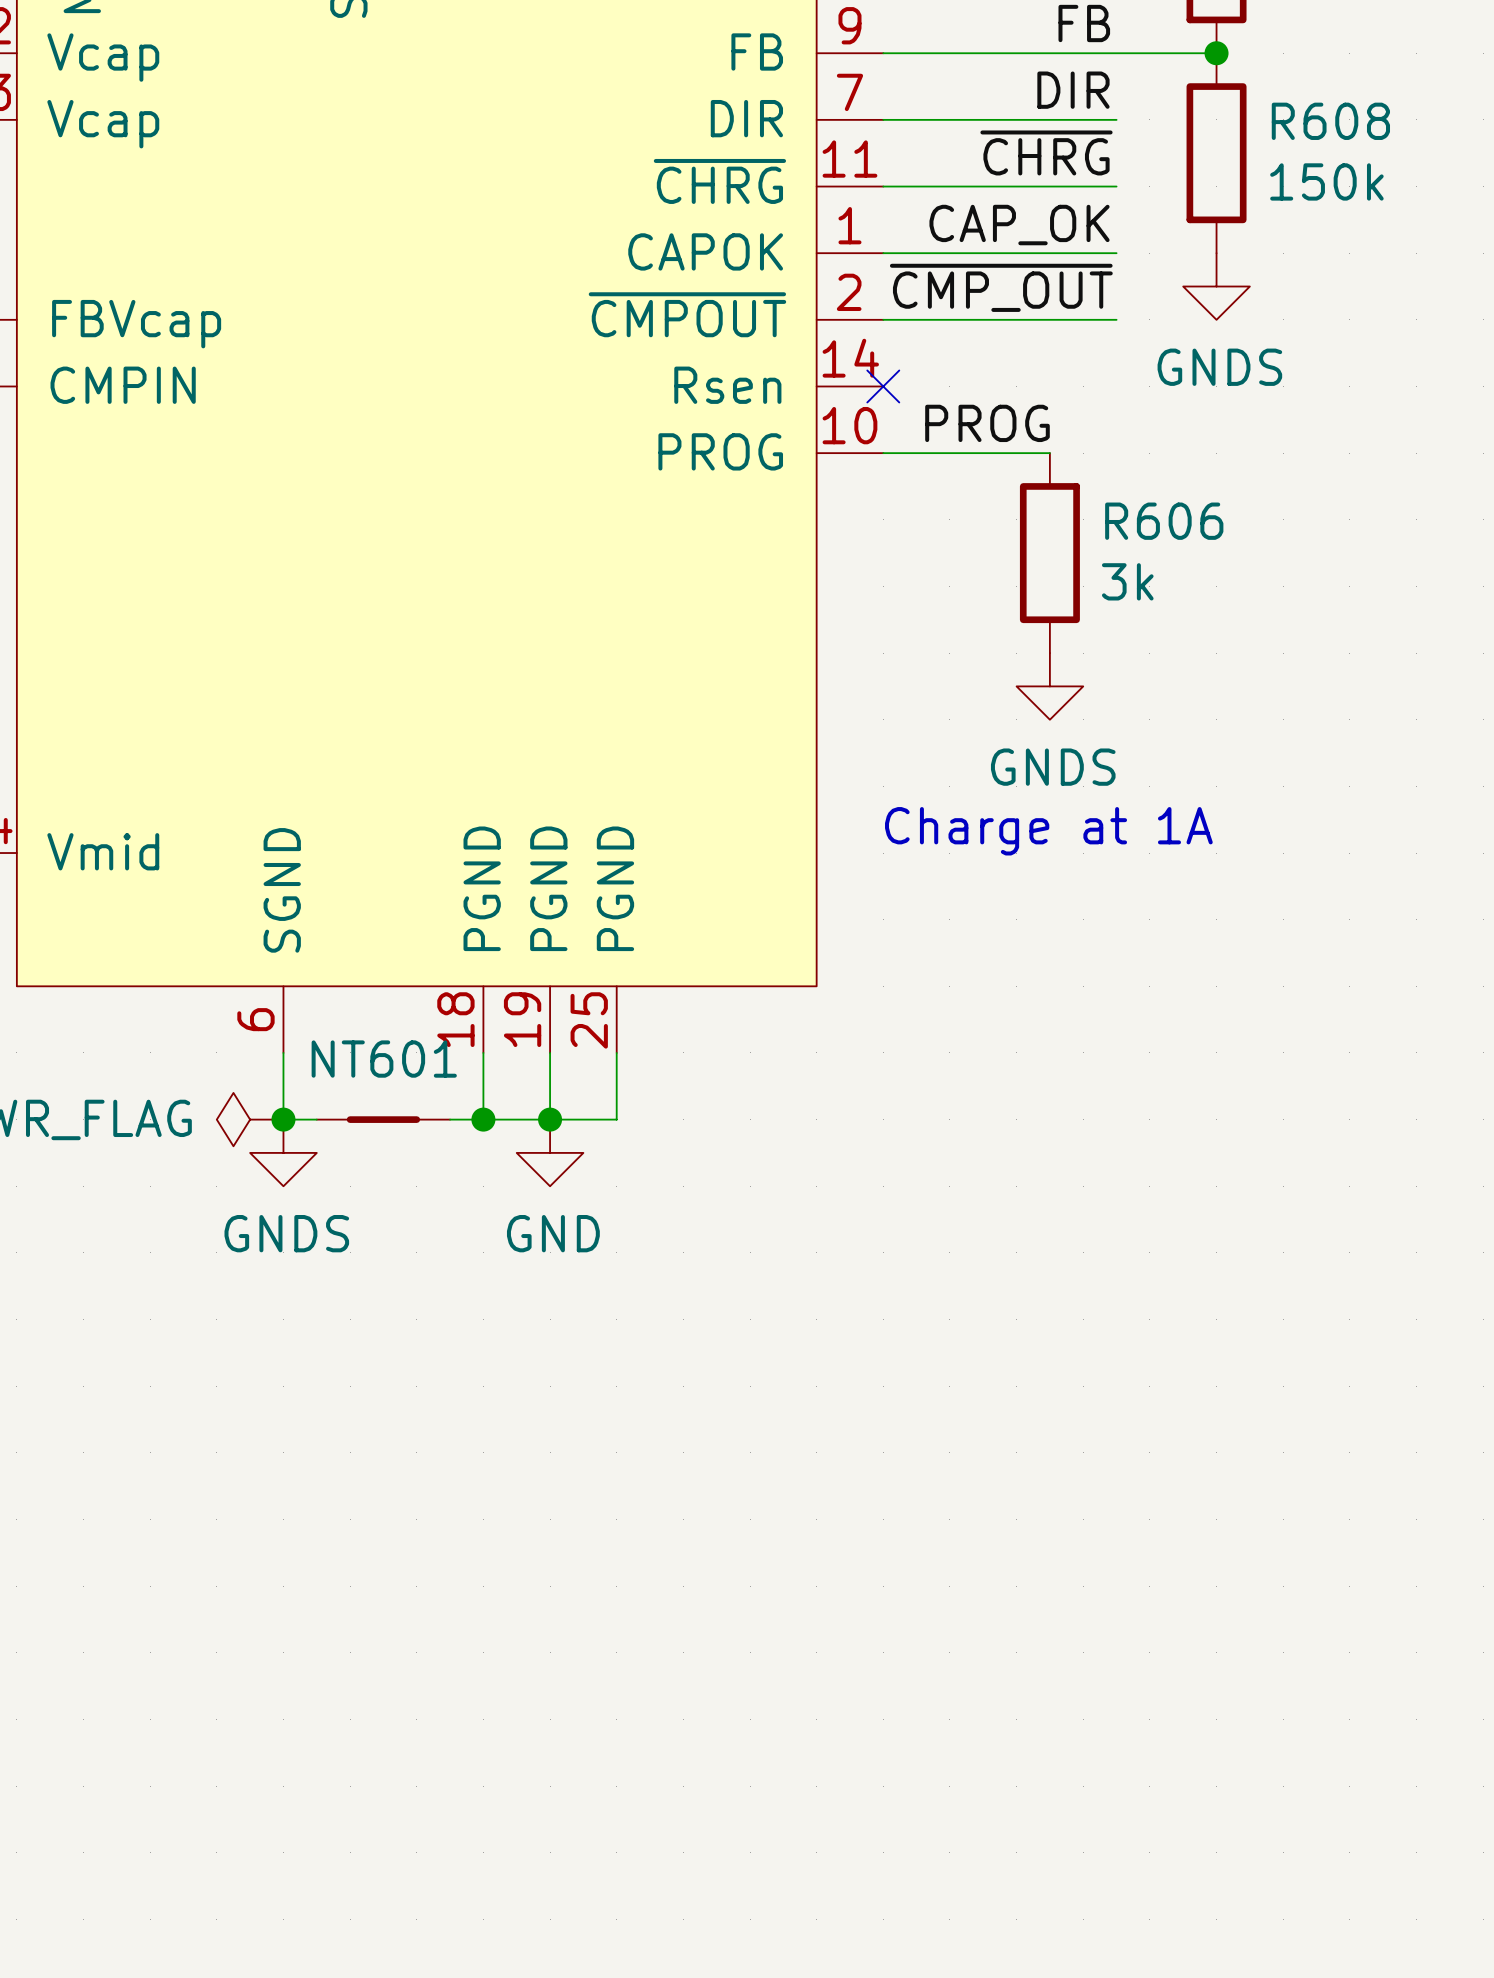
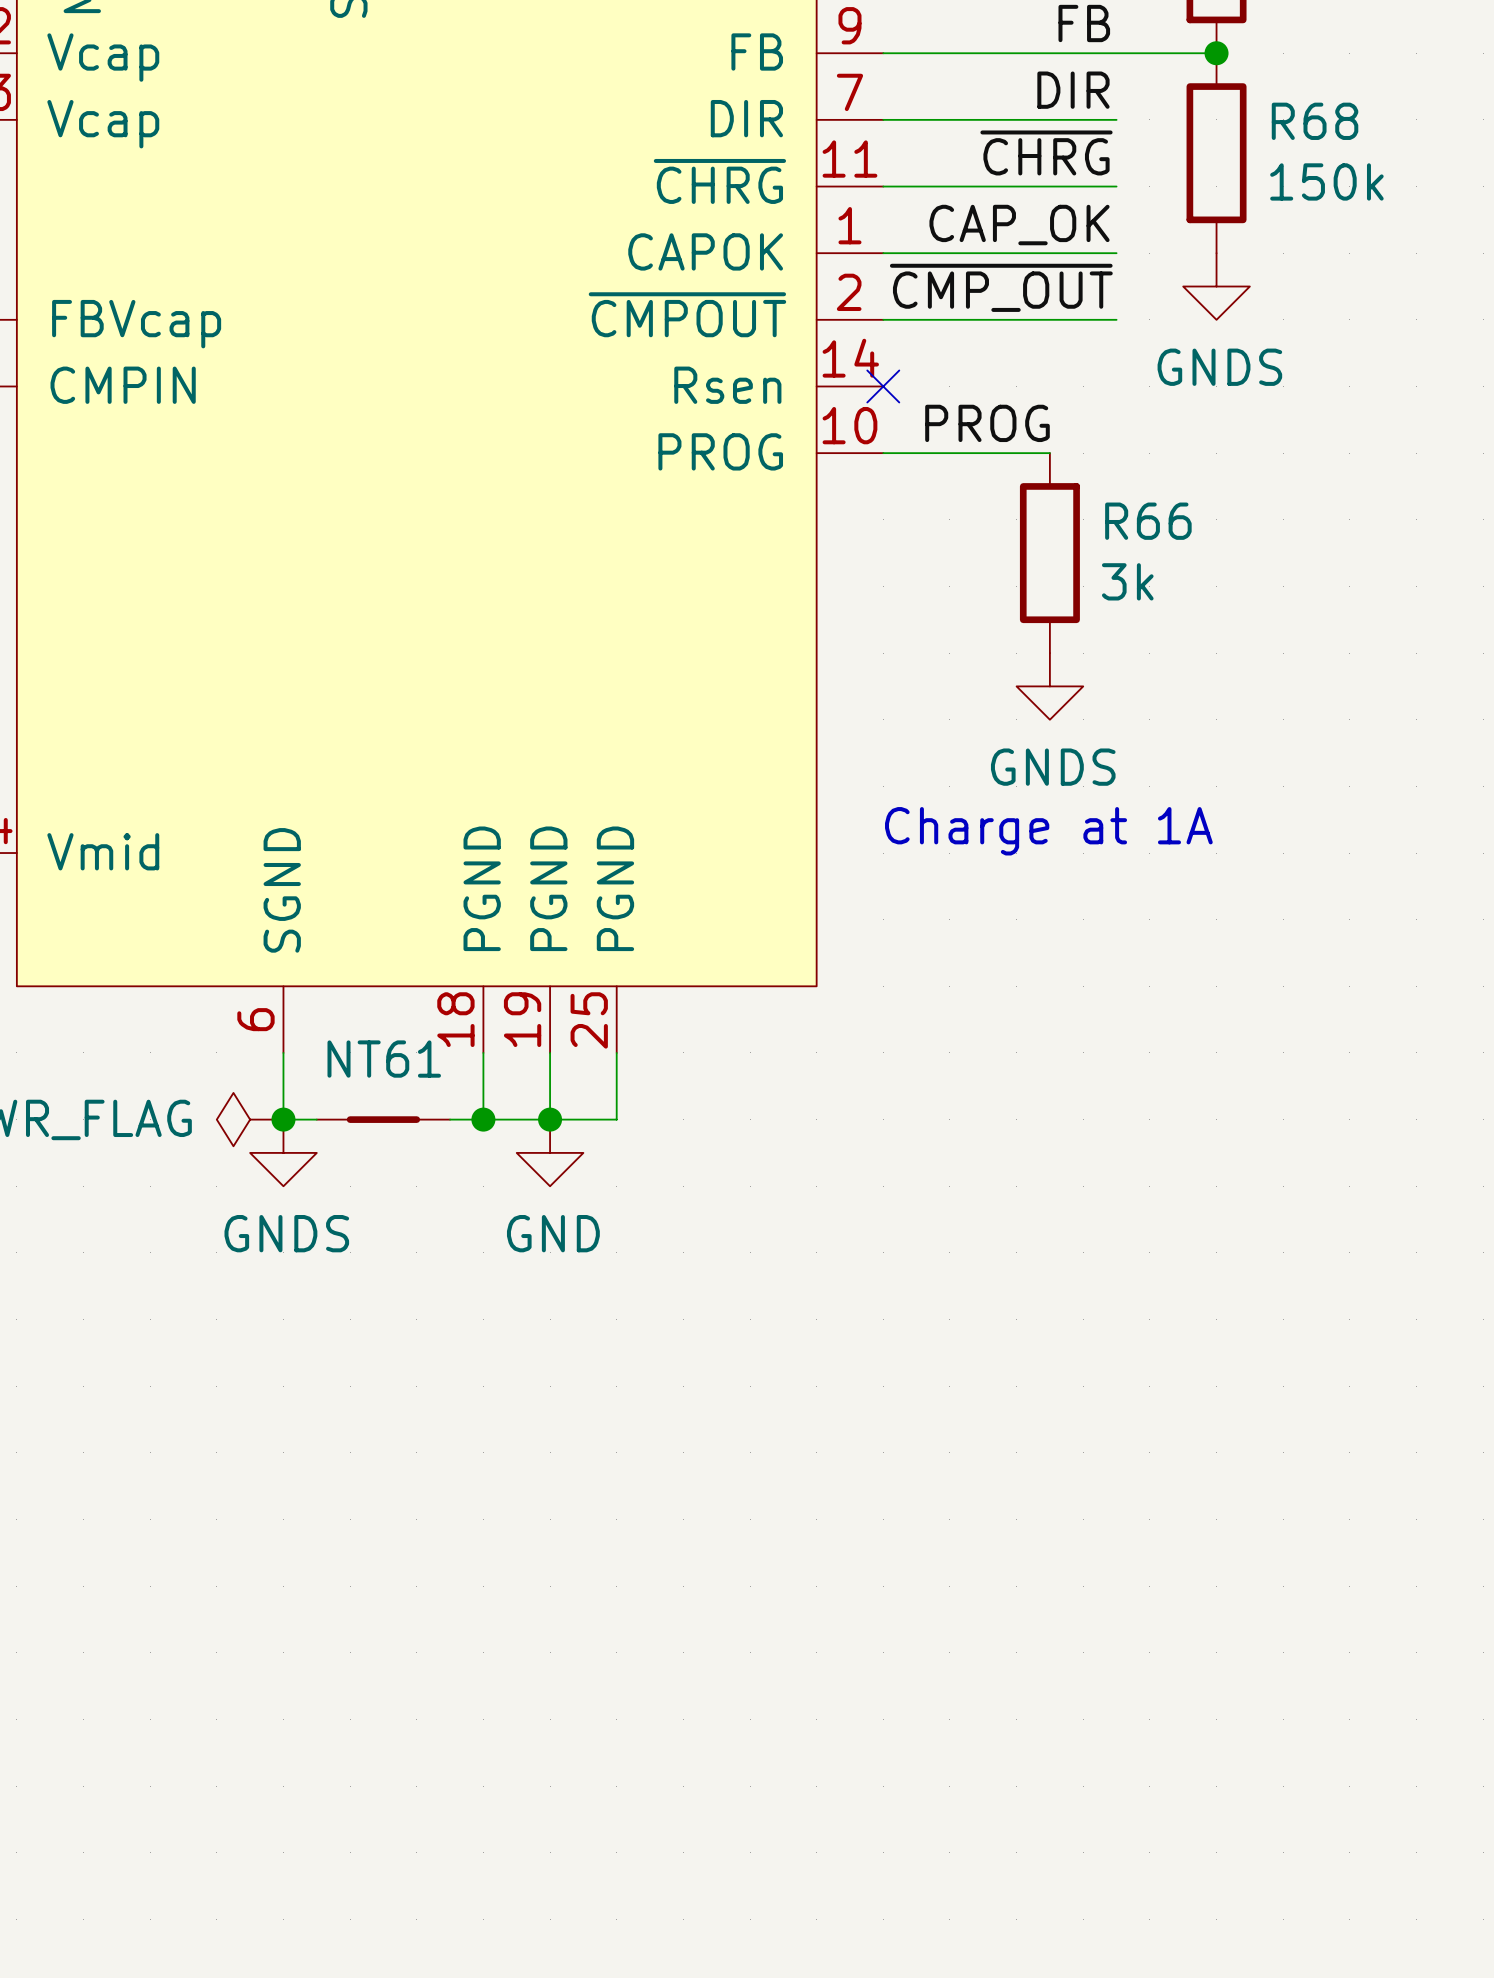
R608 name: R608 (1330, 121) -> R68 (1315, 121)
R606 name: R606 (1164, 521) -> R66 (1148, 521)
NT601 name: NT601 (384, 1059) -> NT61 (384, 1059)

